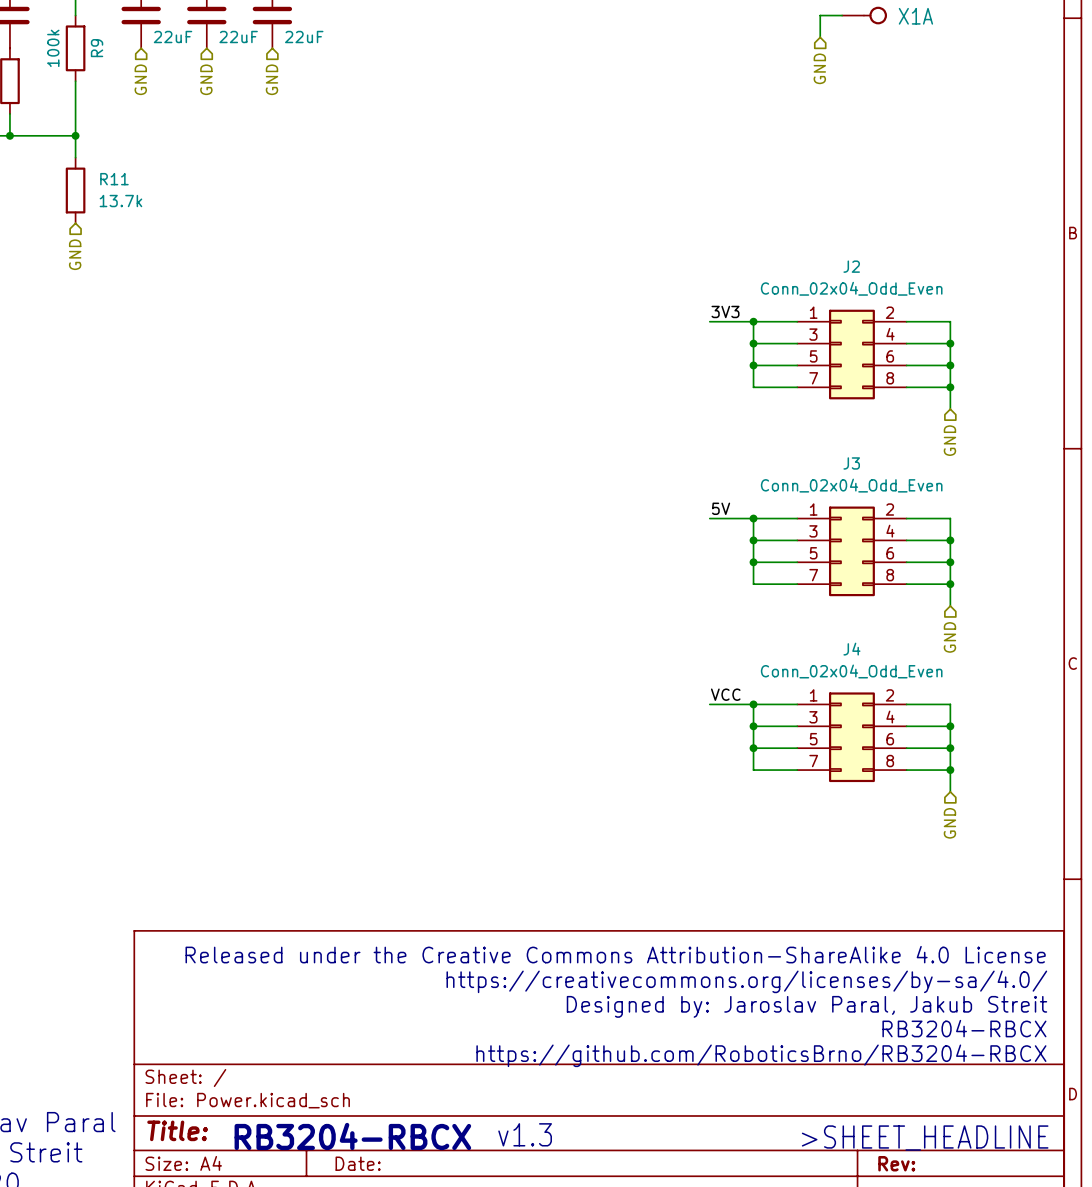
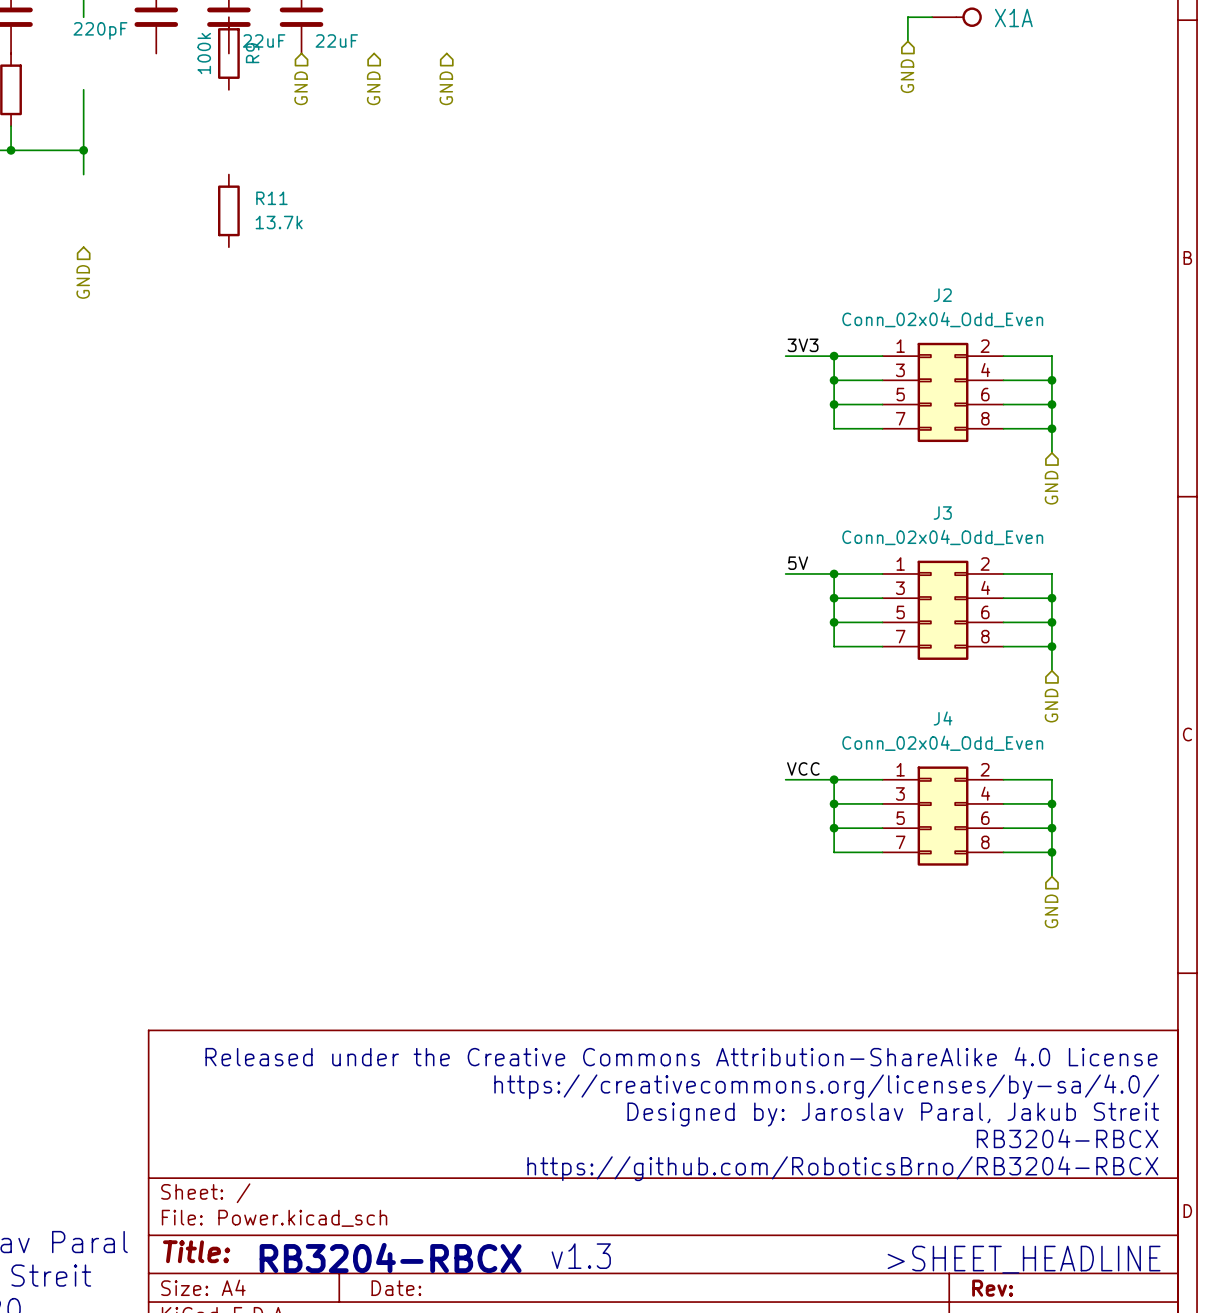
part value: 22uF (173, 37) -> 220pF (100, 30)
R9 position: (75, 48) -> (228, 53)
hierarchical label: GND (140, 79) -> none
hierarchical label: GND (206, 79) -> none
hierarchical label: none -> GND (373, 88)
hierarchical label: none -> GND (446, 88)
R11 position: (75, 190) -> (228, 210)

